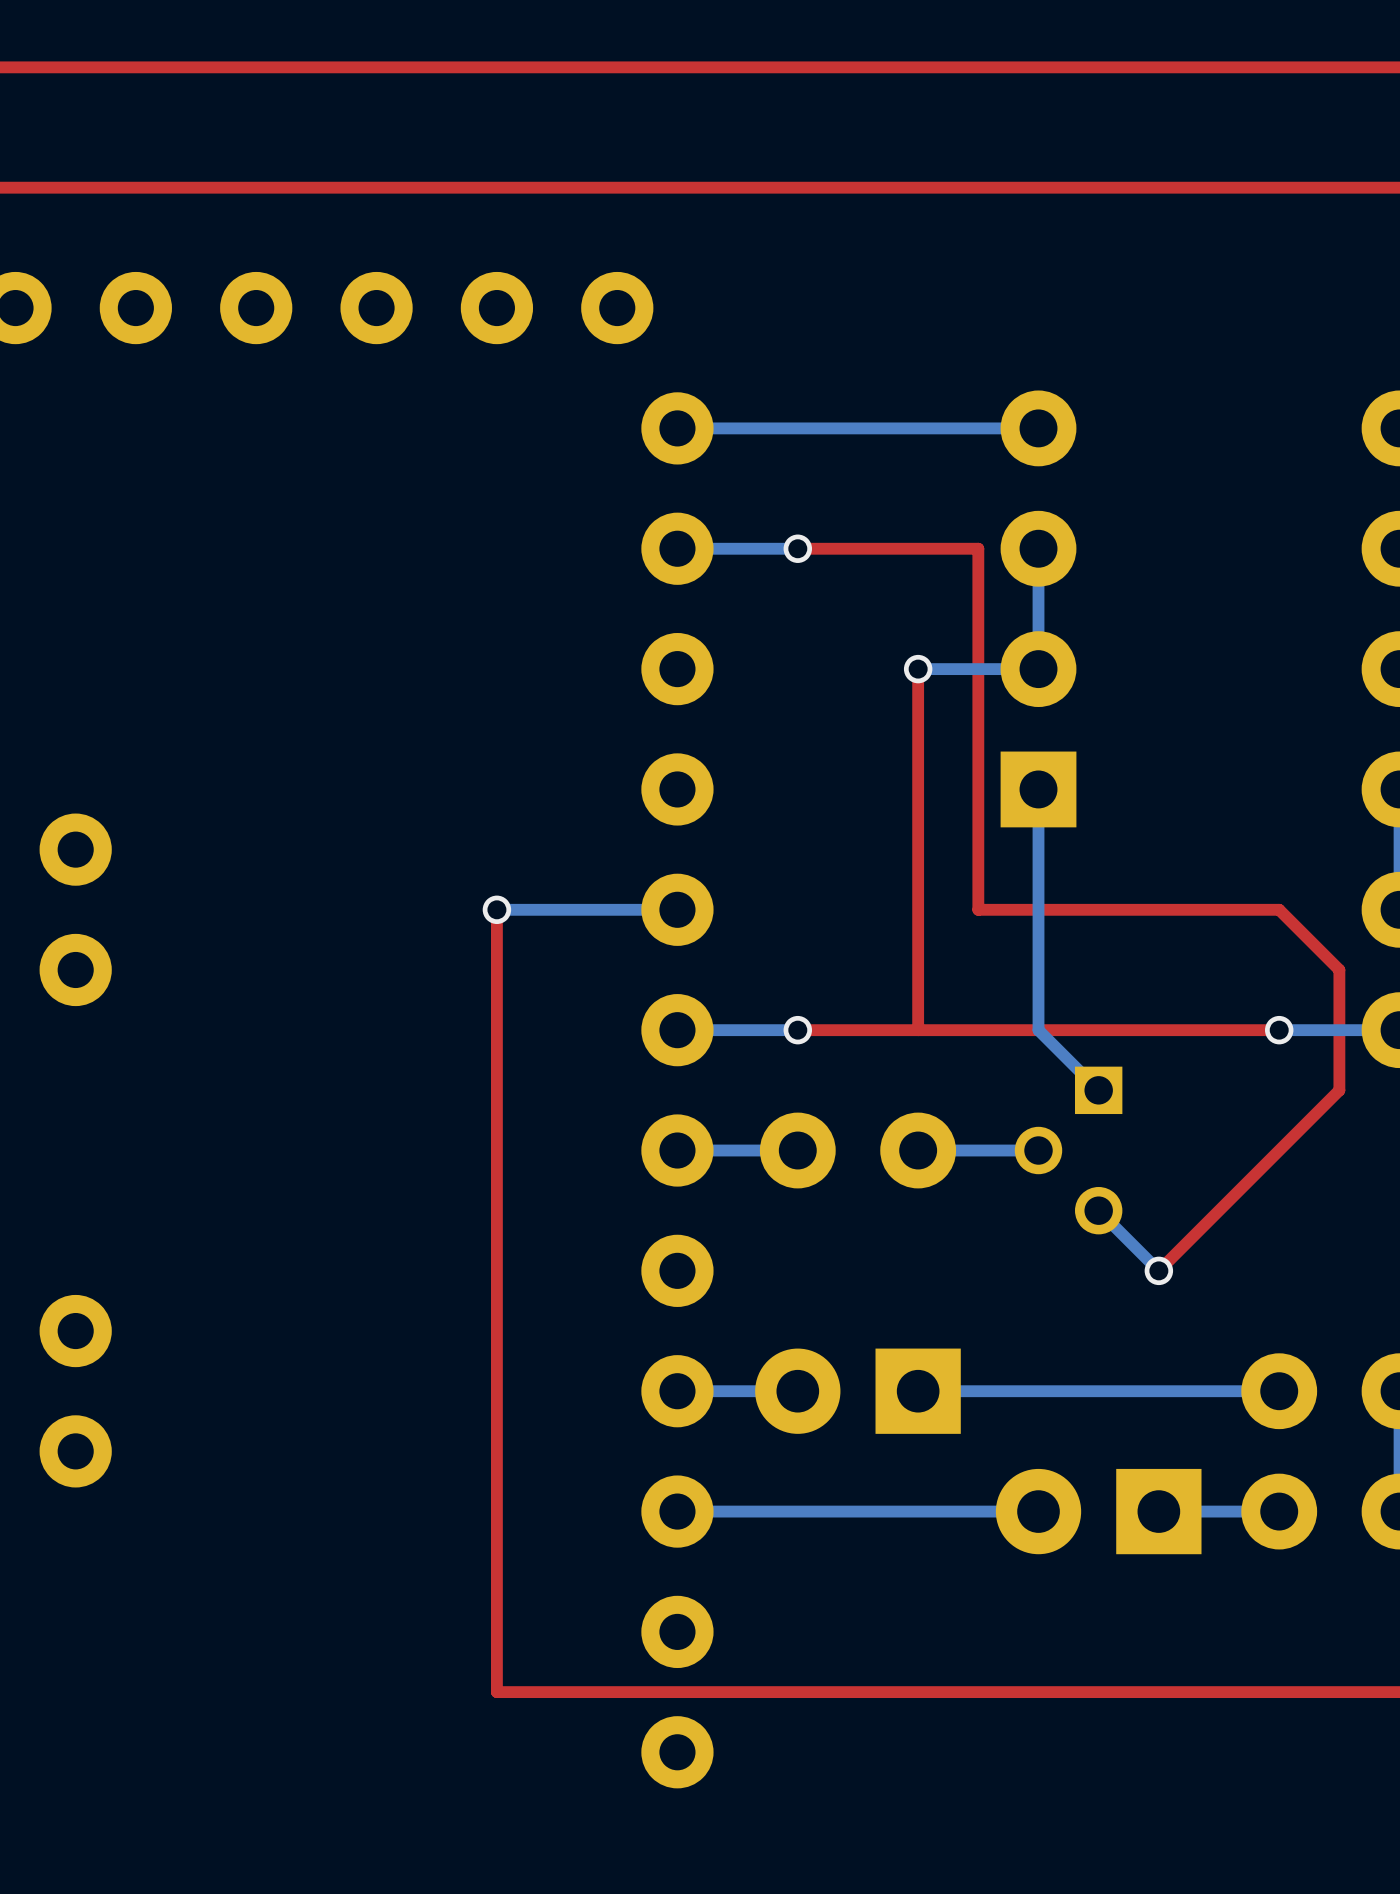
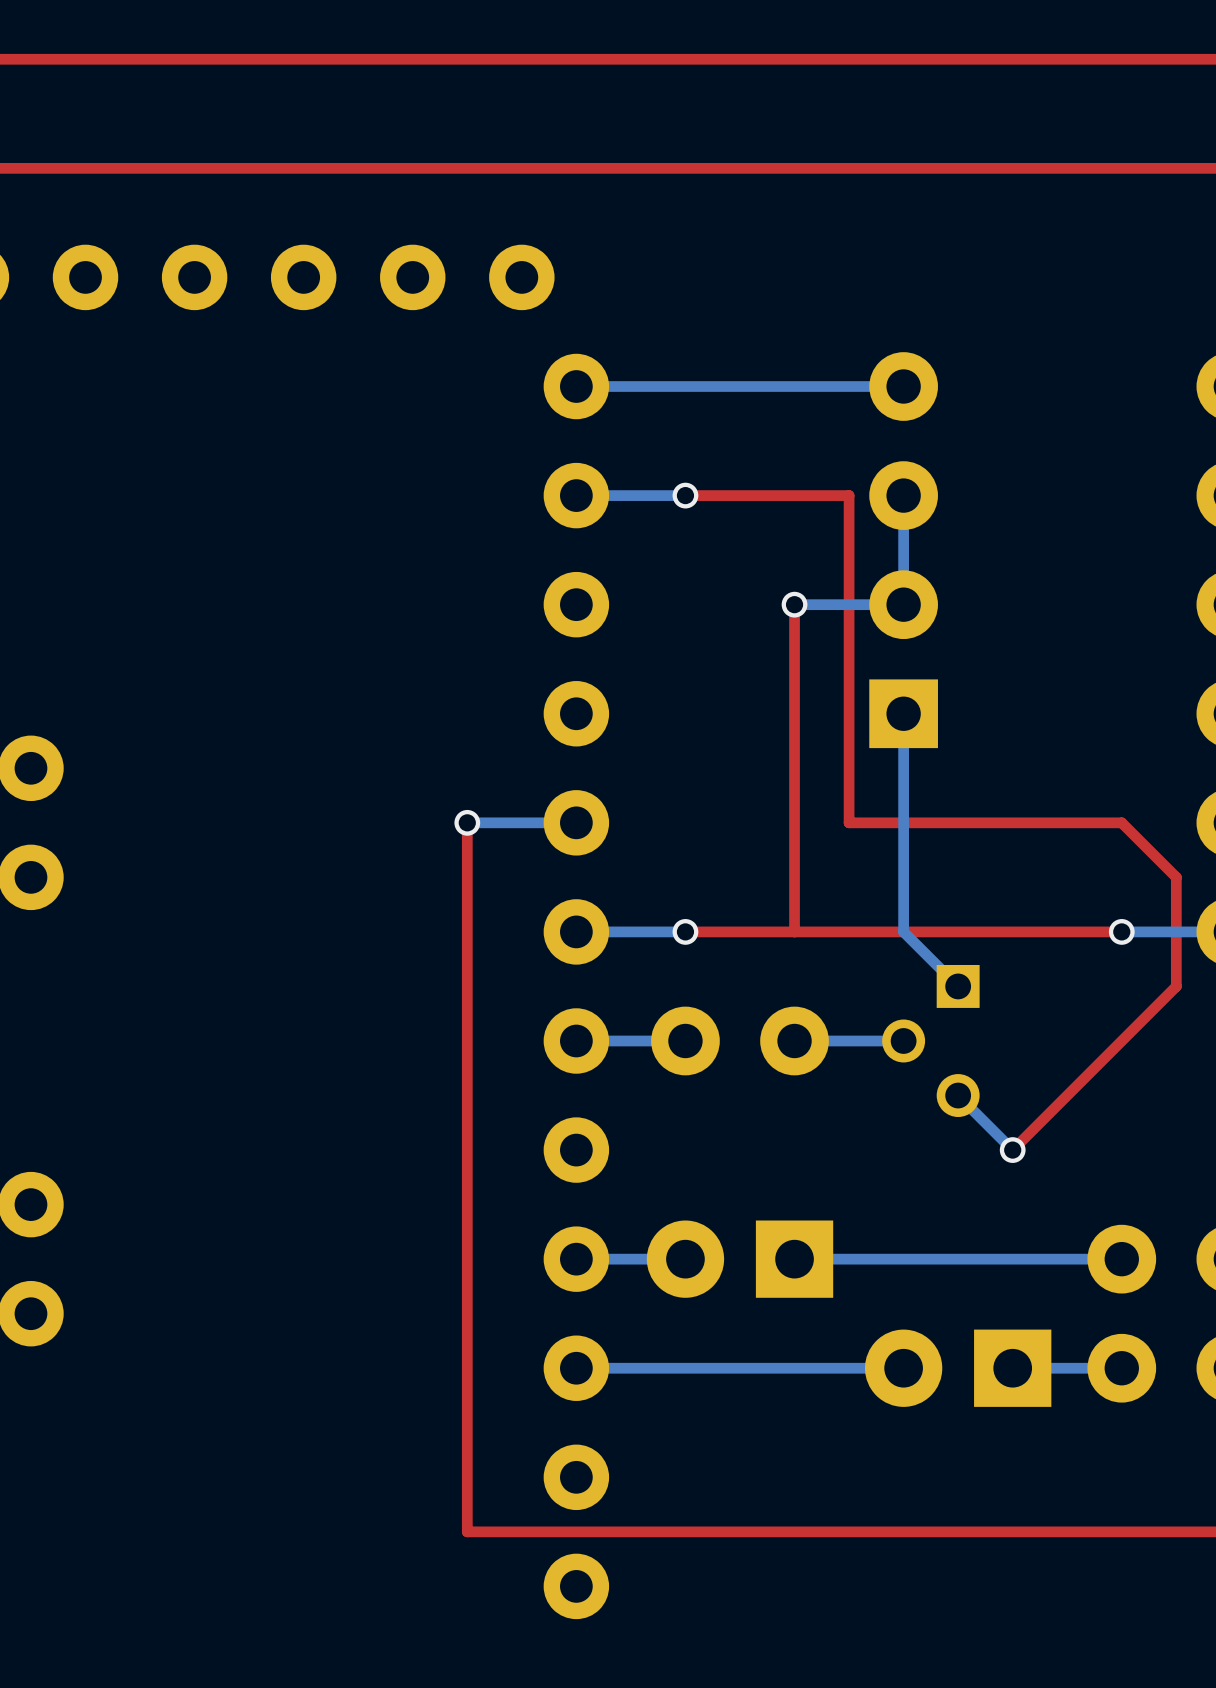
top track: (496, 909) (496, 1692) (557, 1692) -> (467, 822) (467, 1531)
via position: (496, 909) -> (467, 822)
bottom track: (557, 909) (496, 909) -> none

